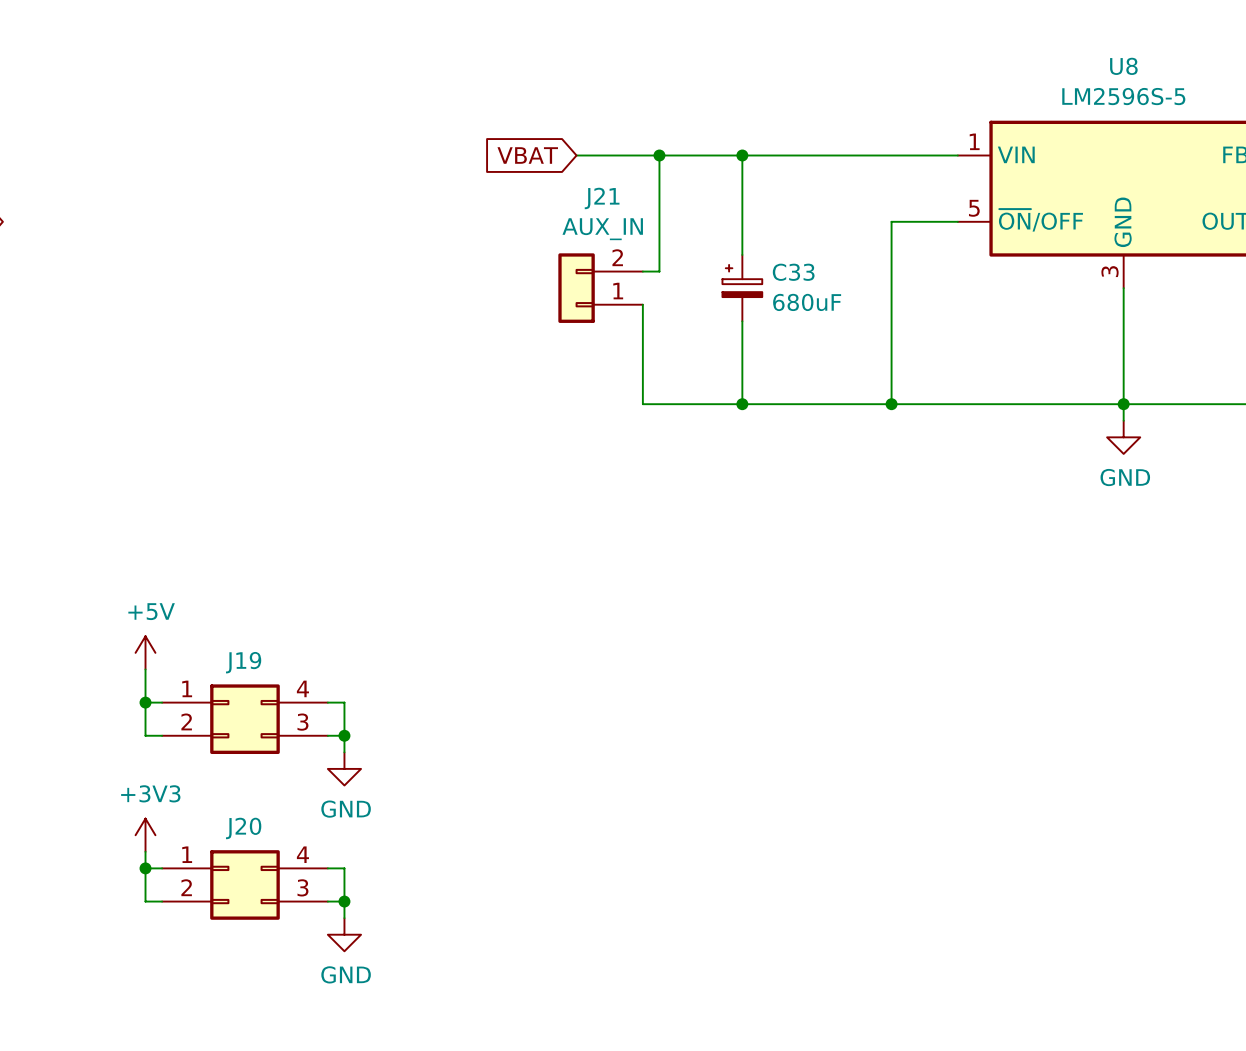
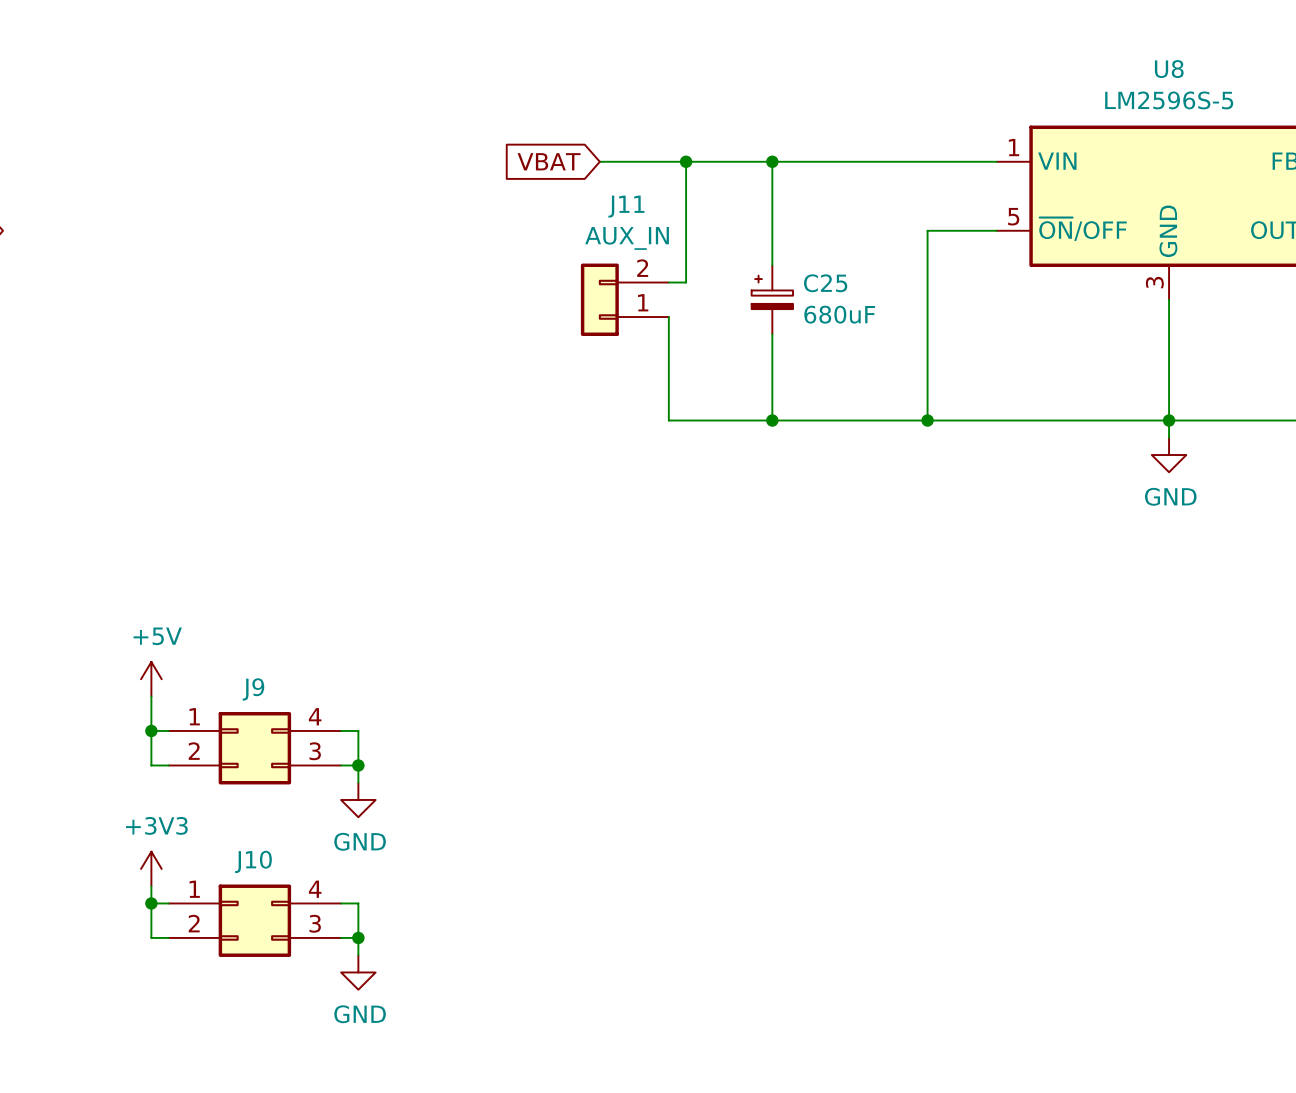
J21 name: J21 (602, 198) -> J11 (626, 206)
C33 name: C33 (793, 272) -> C25 (825, 283)
J19 name: J19 (243, 662) -> J9 (253, 689)
J20 name: J20 (243, 828) -> J10 (253, 861)

